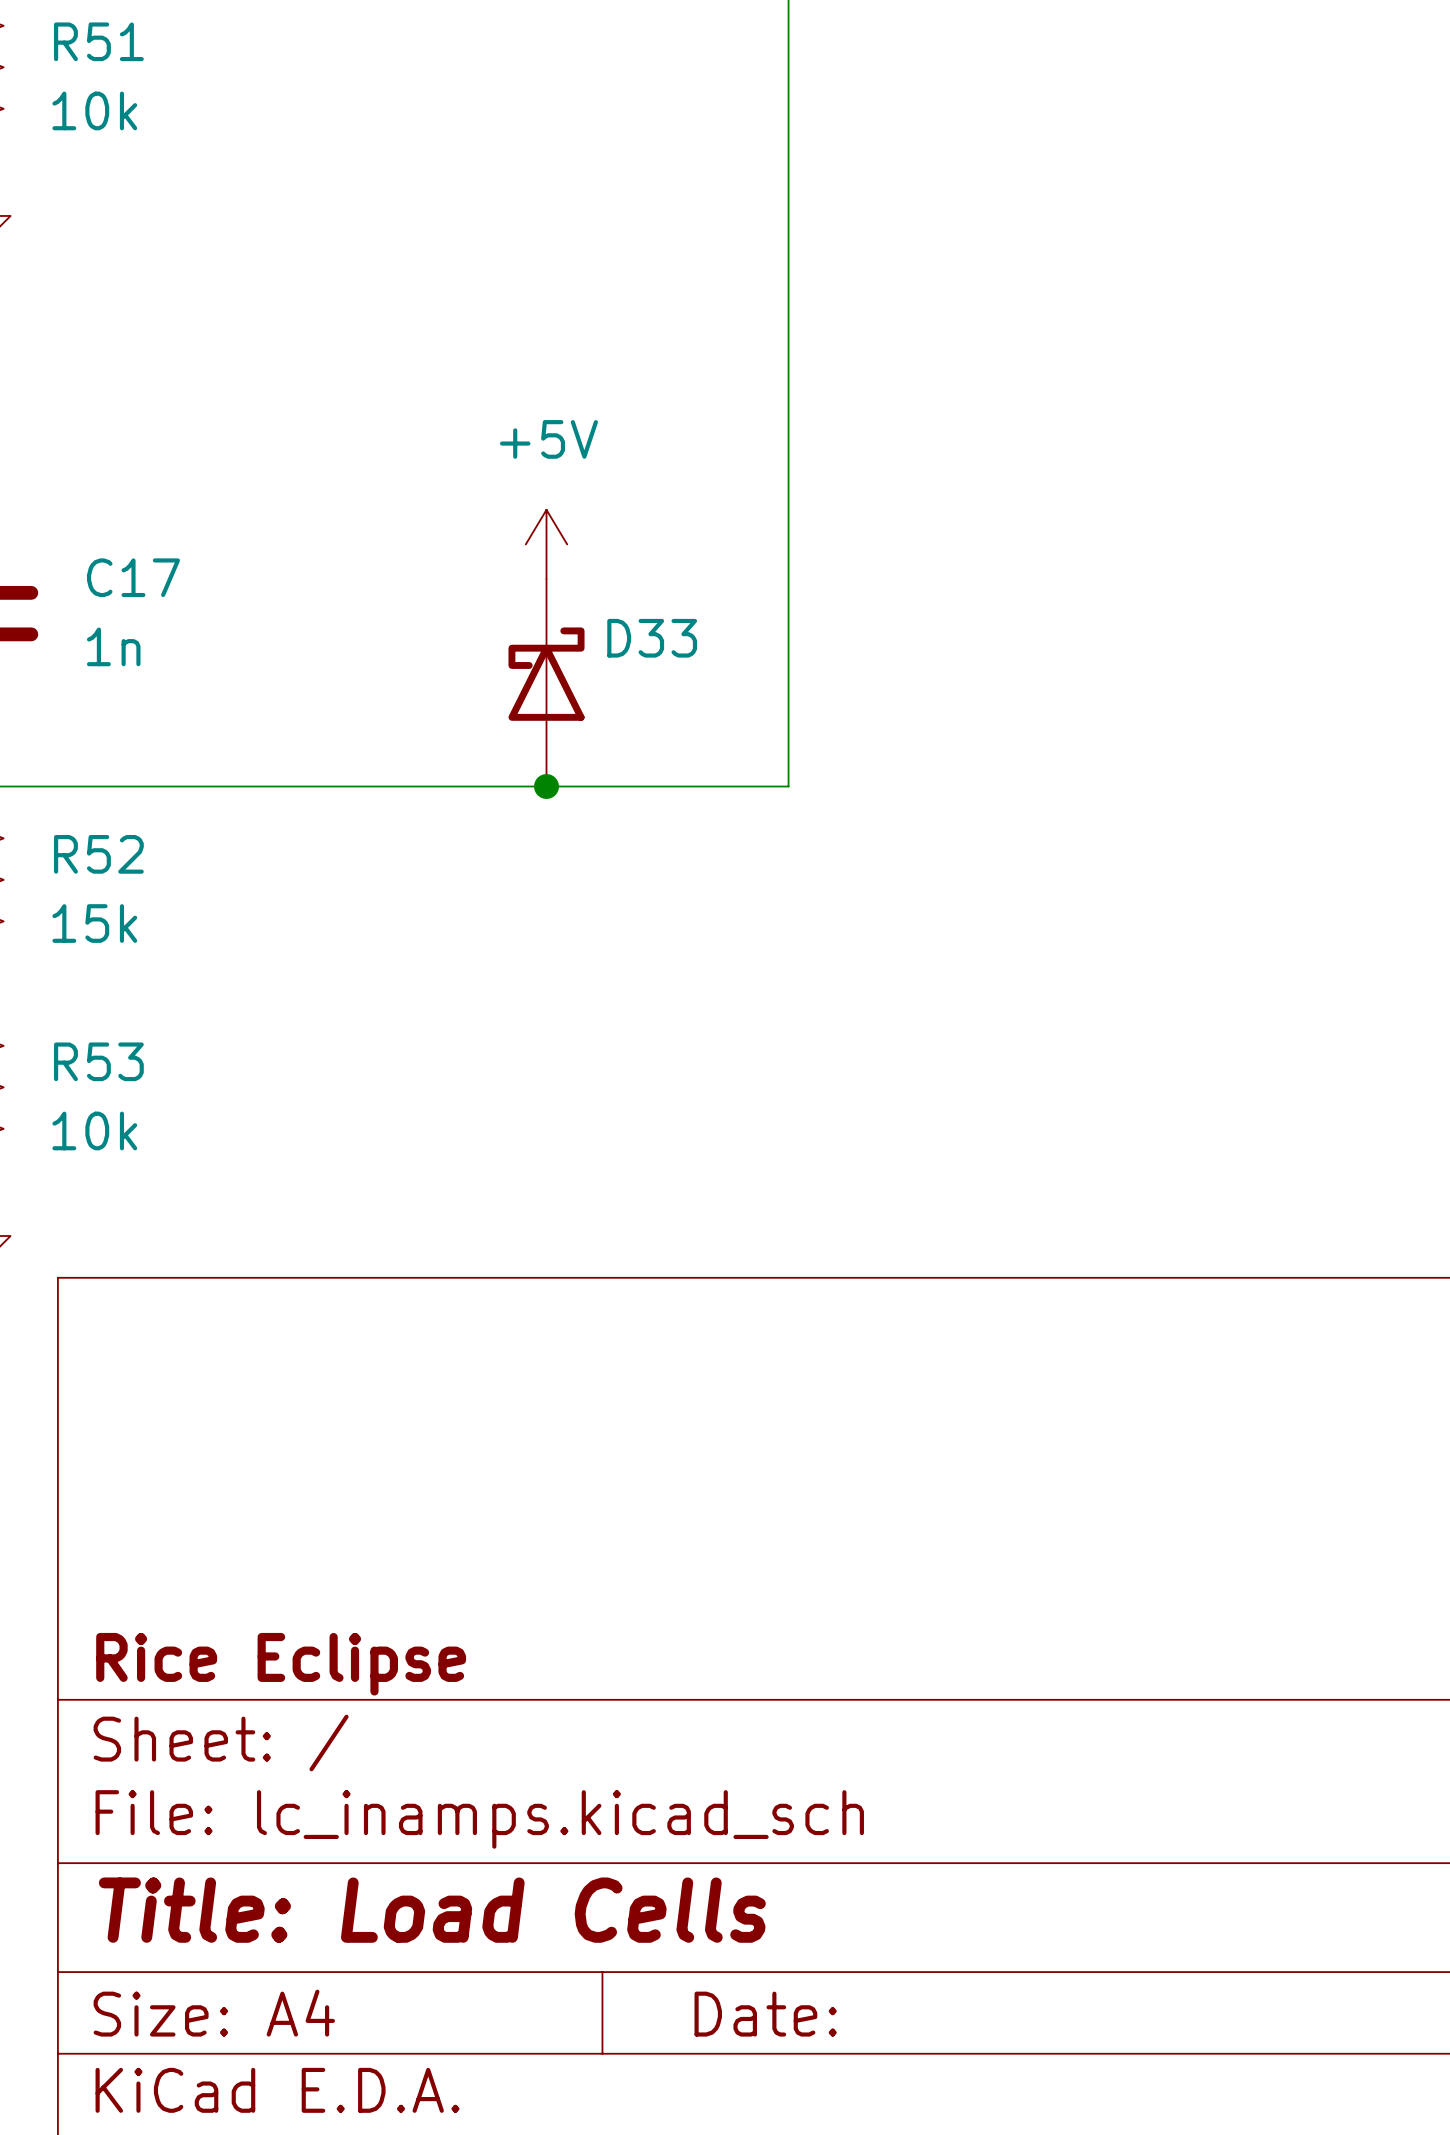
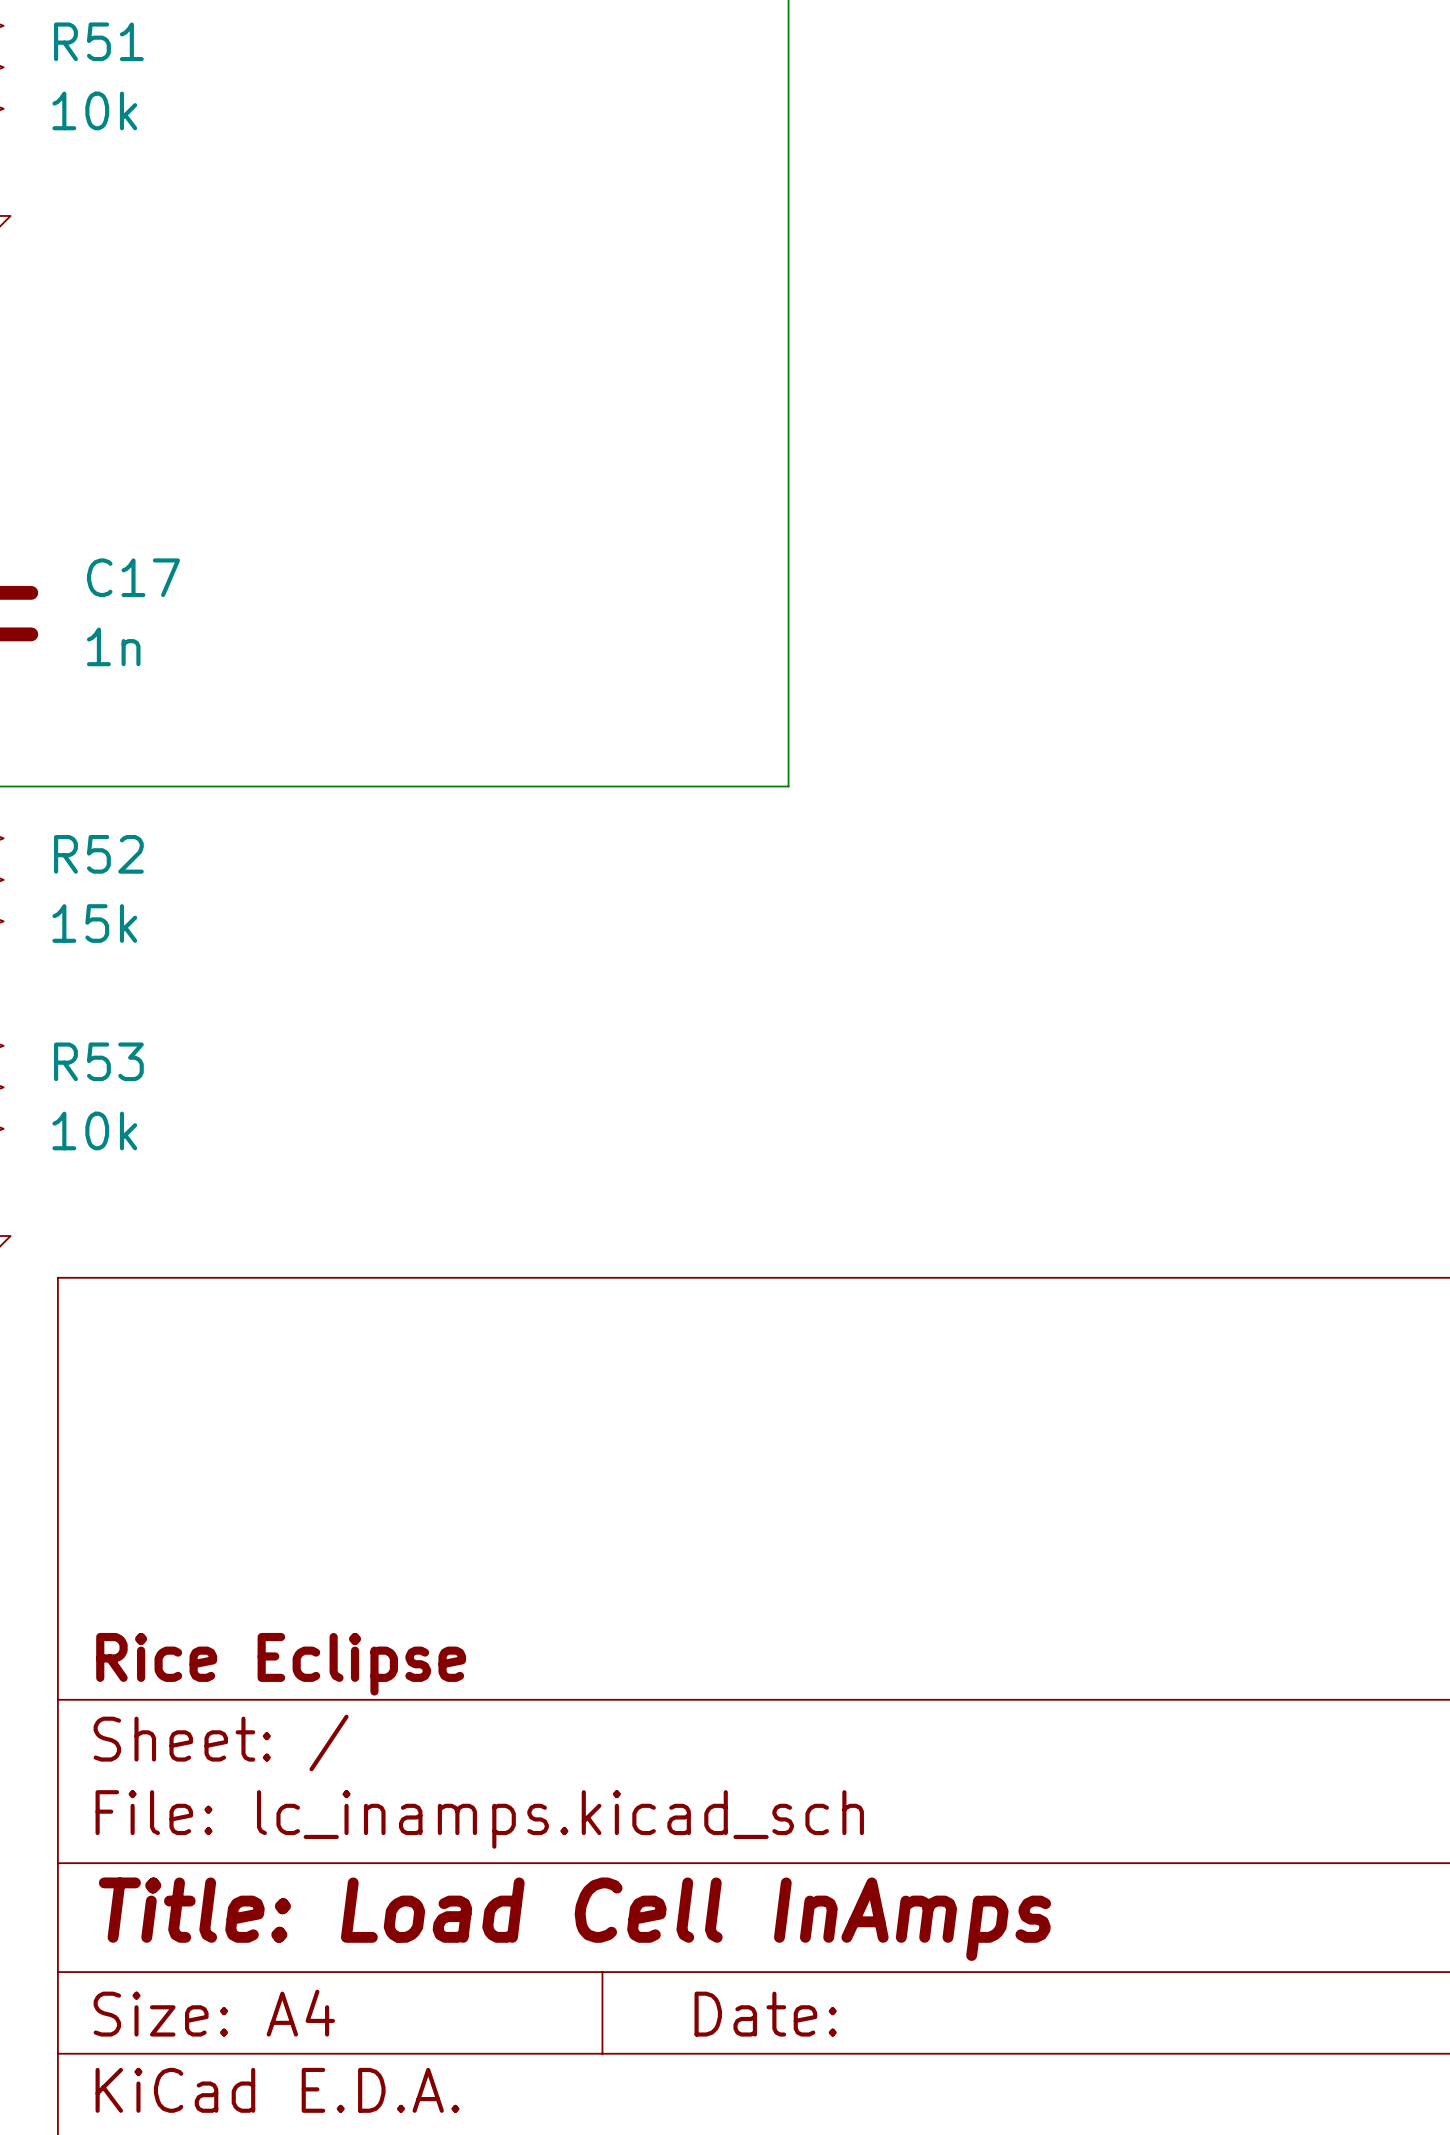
power symbol: +5V (546, 544) -> none
D33: (546, 682) -> none
junction: (546, 786) -> none
title block: Title: Load Cells (432, 1910) -> Title: Load Cell InAmps (574, 1919)

